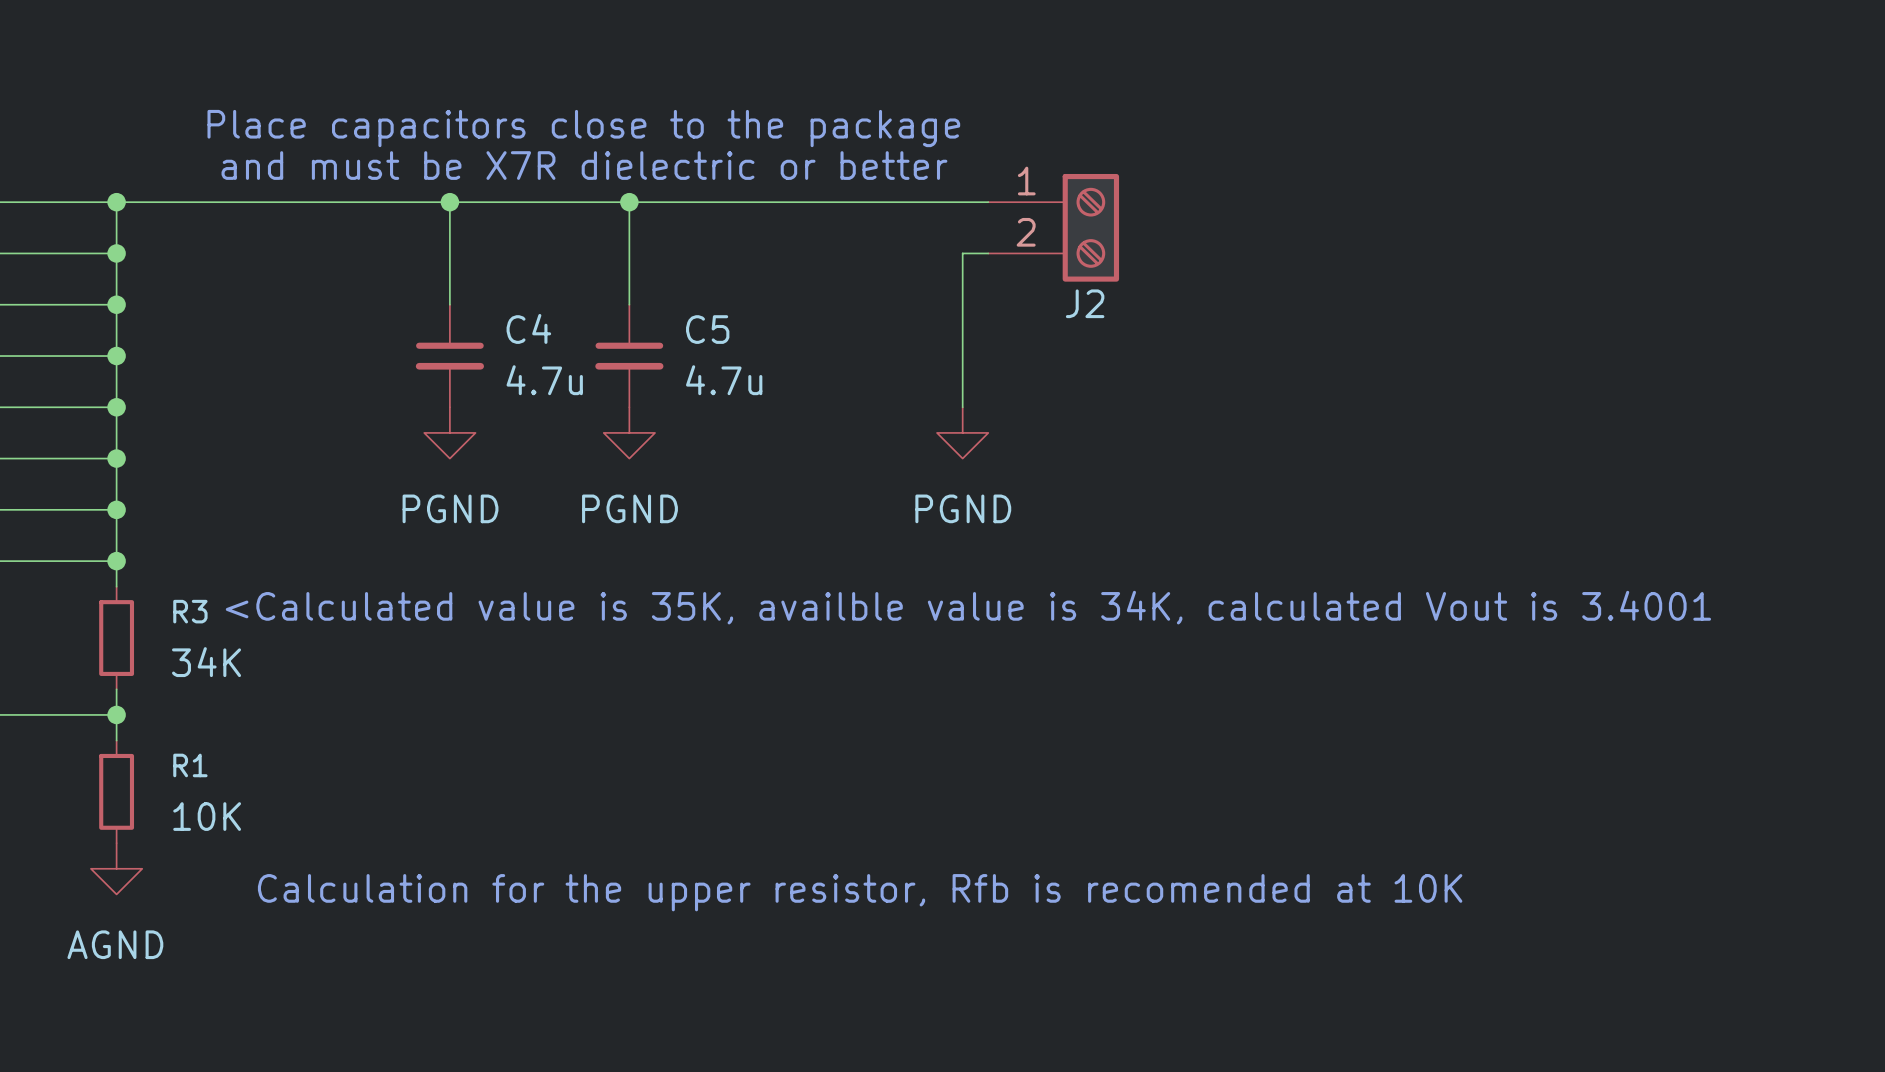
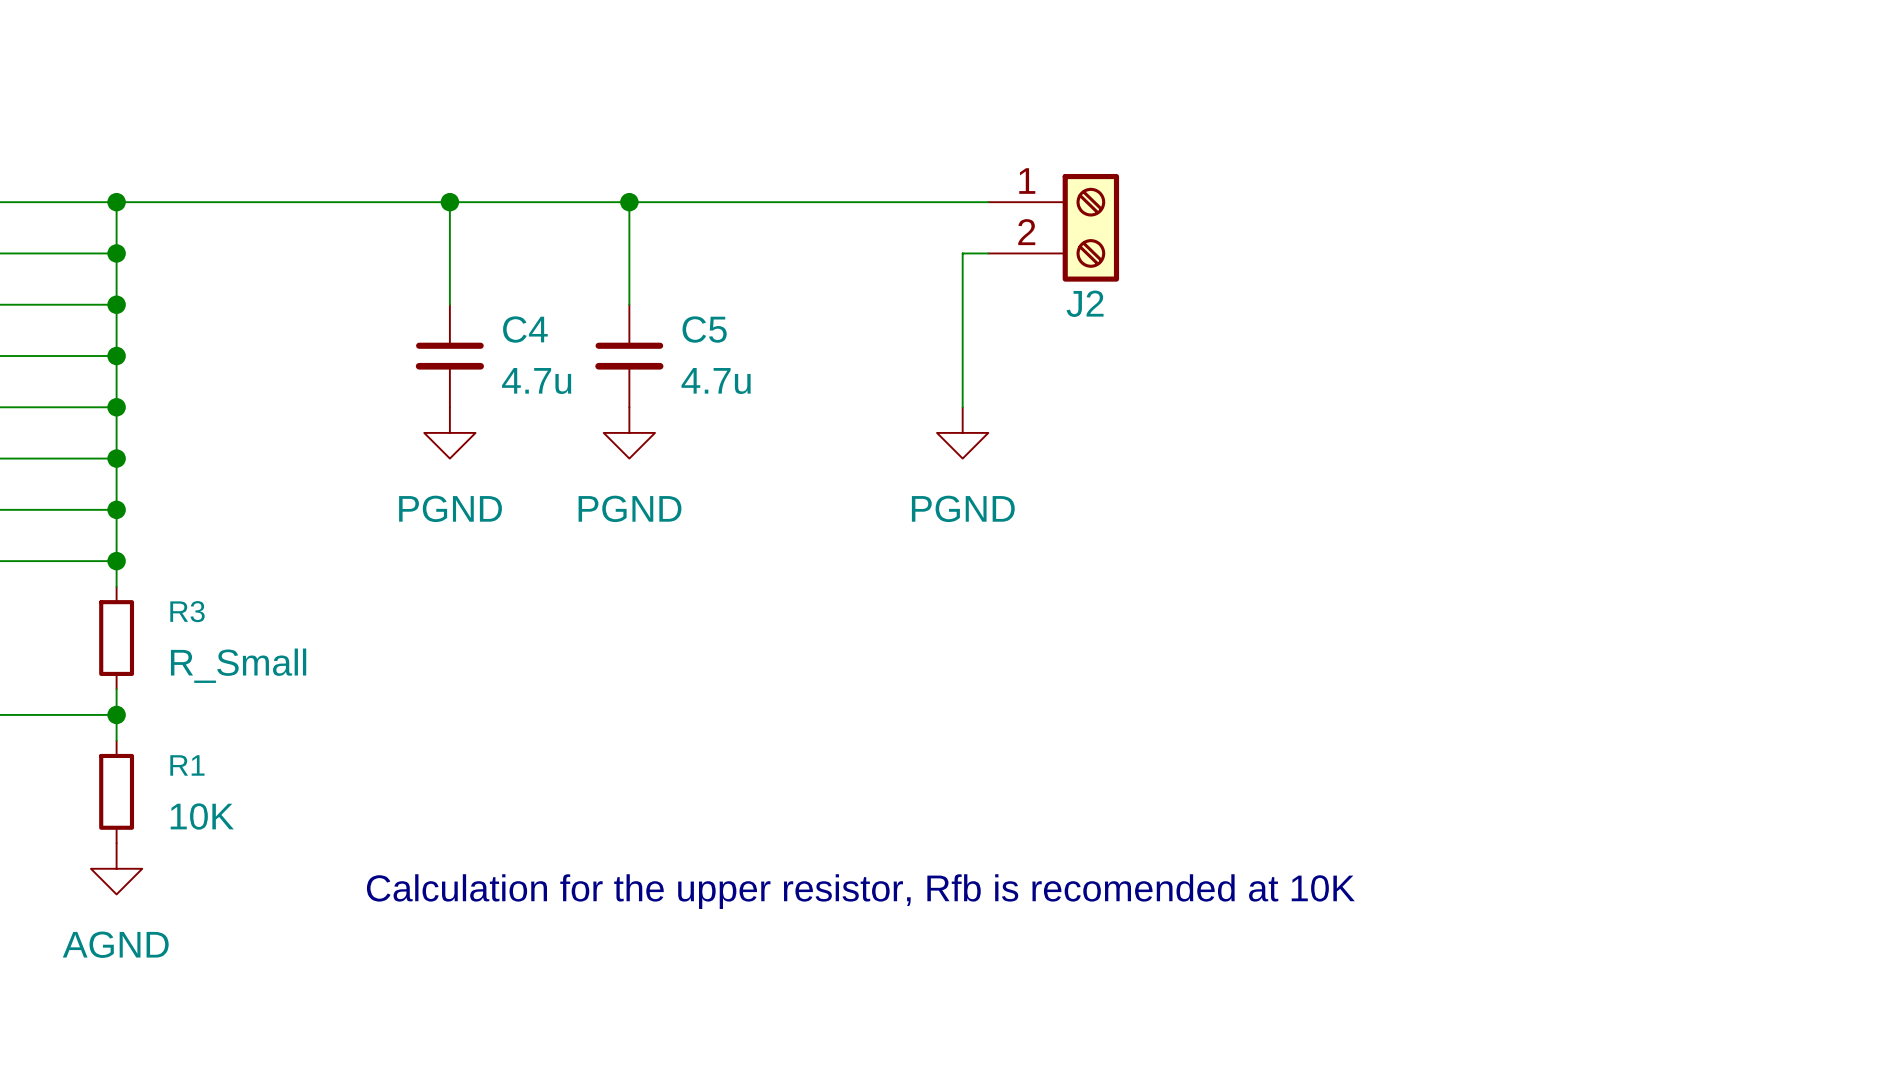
text: Place capacitors close to the package (583, 128) -> none
text: and must be X7R dielectric or better (584, 165) -> none
text: <Calculated value is 35K, availble value is 34K, calculated Vout is 3.4001 (968, 607) -> none
R3 value: 34K (206, 662) -> R_Small (238, 665)

